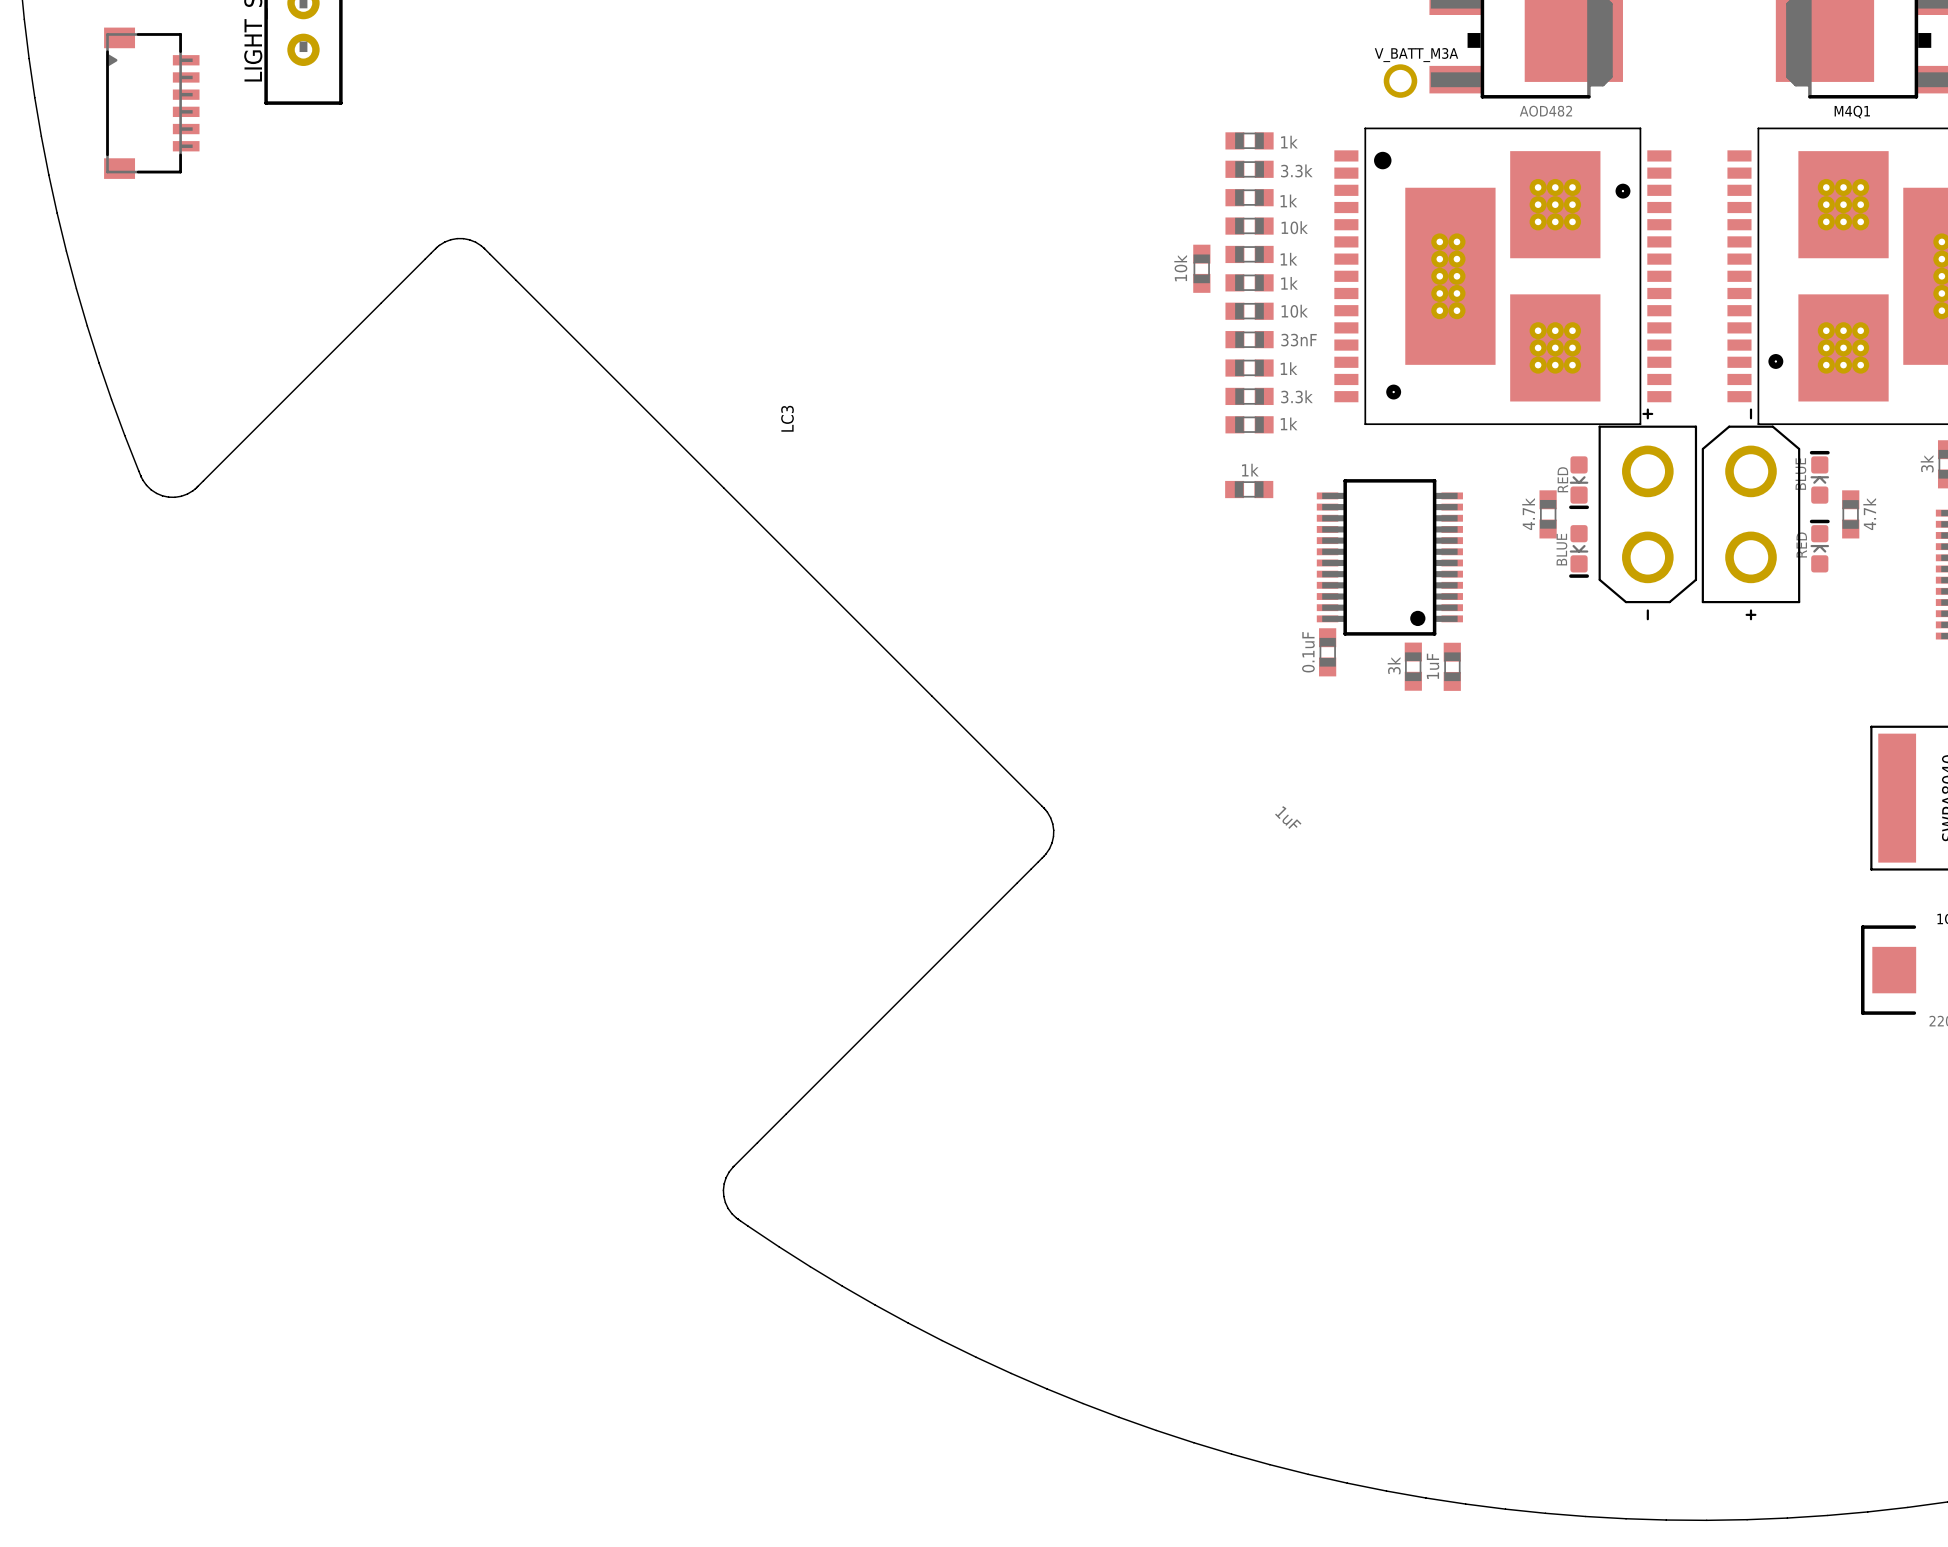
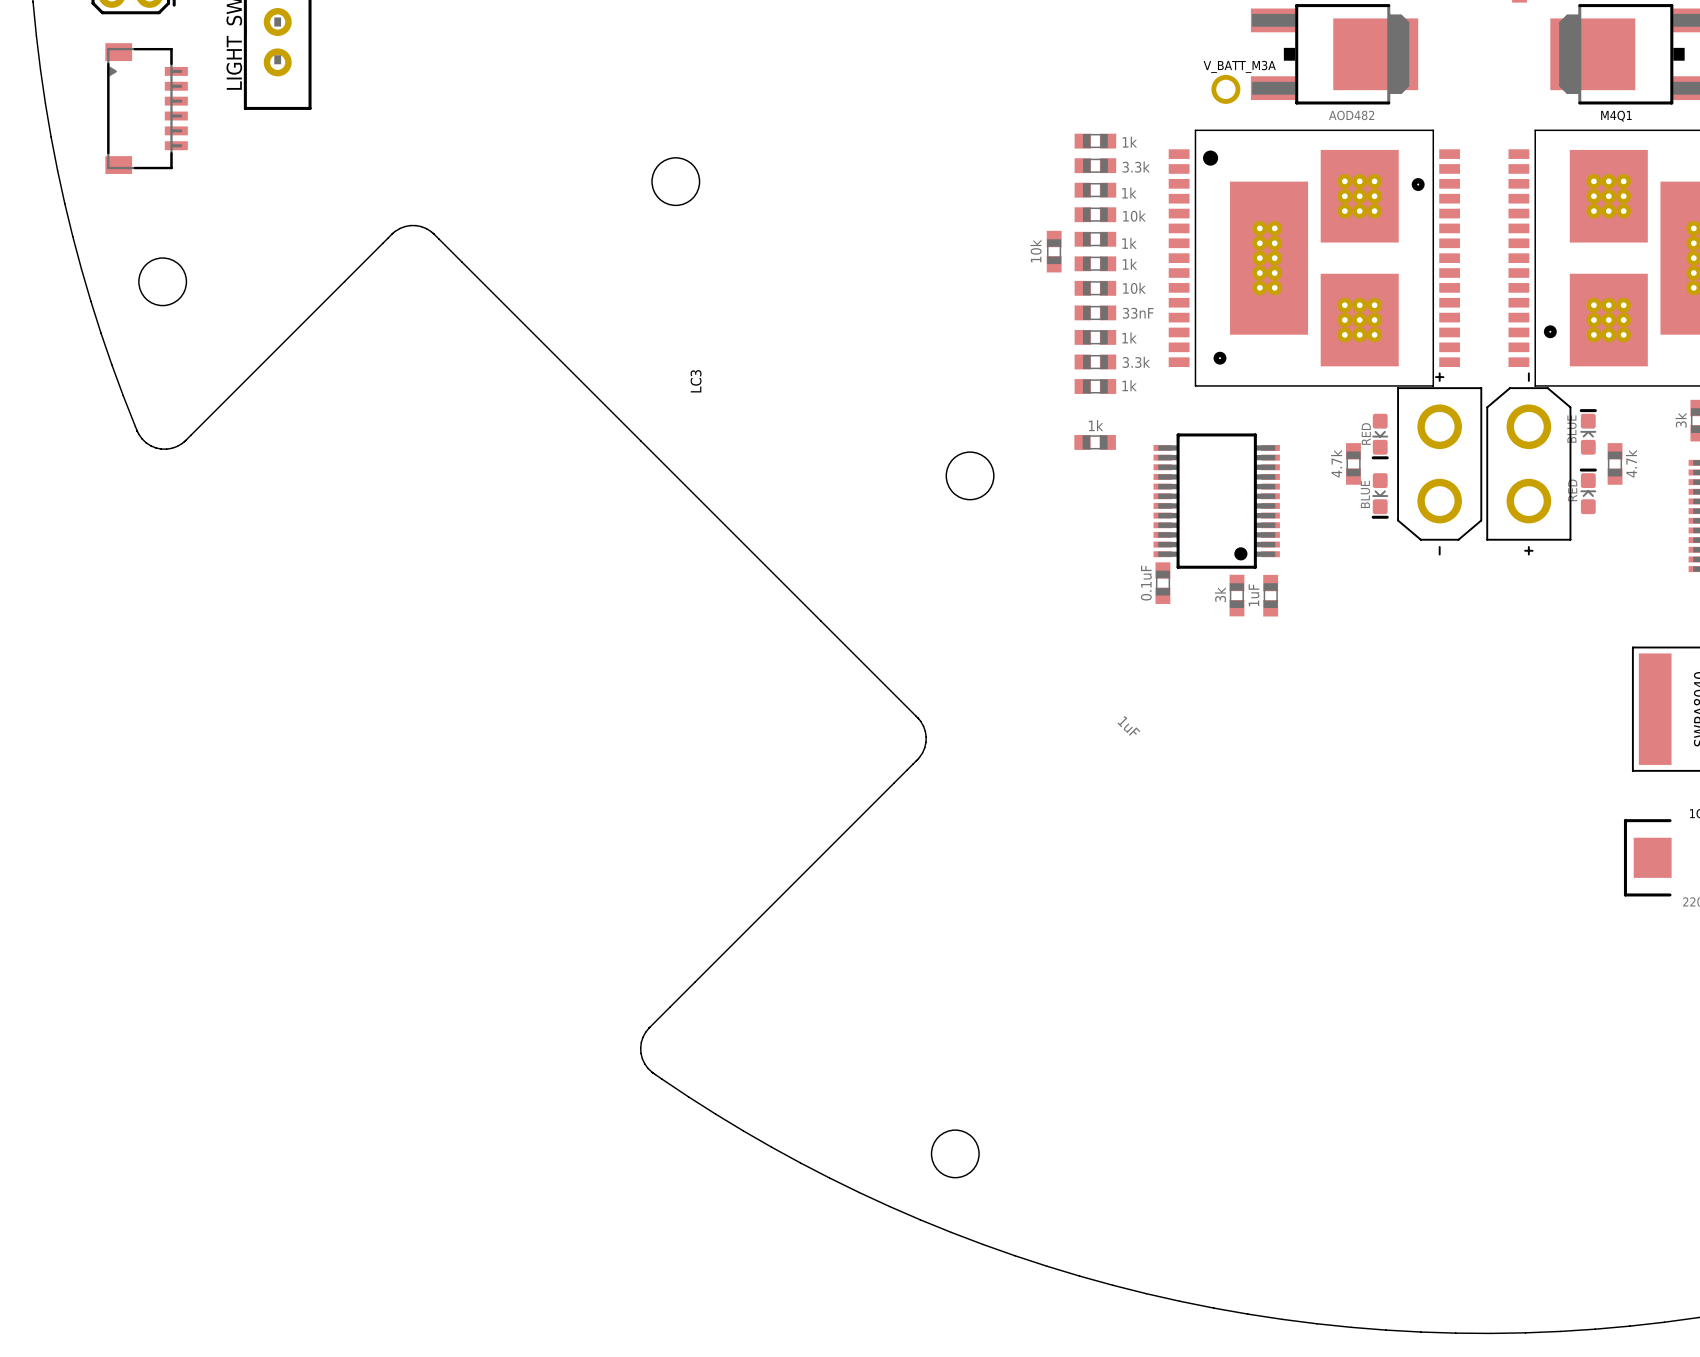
round board edge: none -> [652, 157, 700, 206]
round board edge: none -> [138, 258, 187, 306]
round board edge: none -> [946, 452, 994, 500]
round board edge: none -> [931, 1130, 980, 1178]

